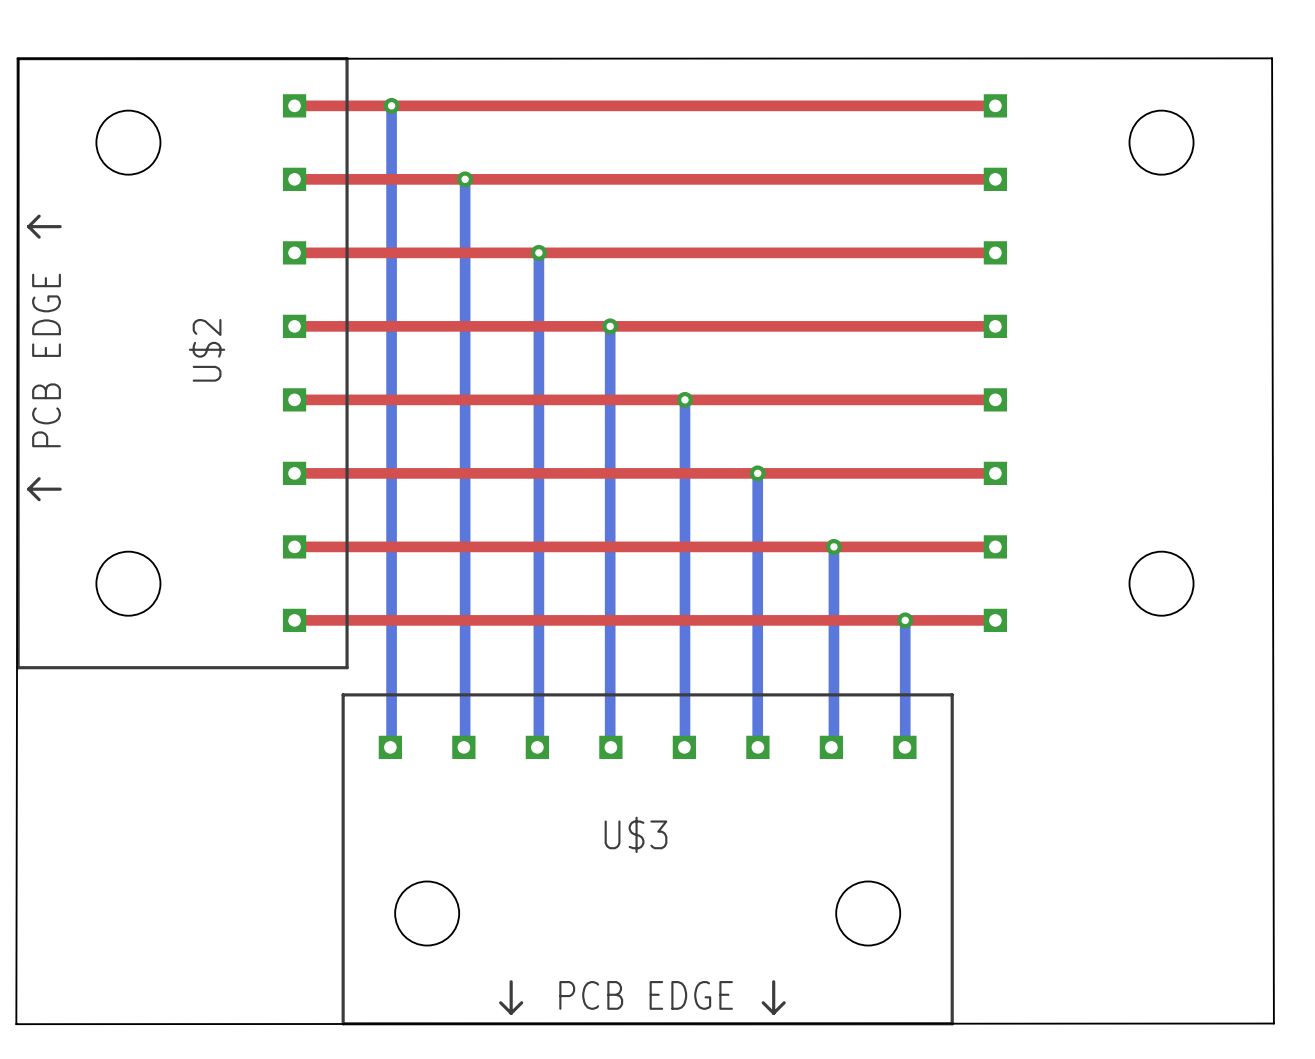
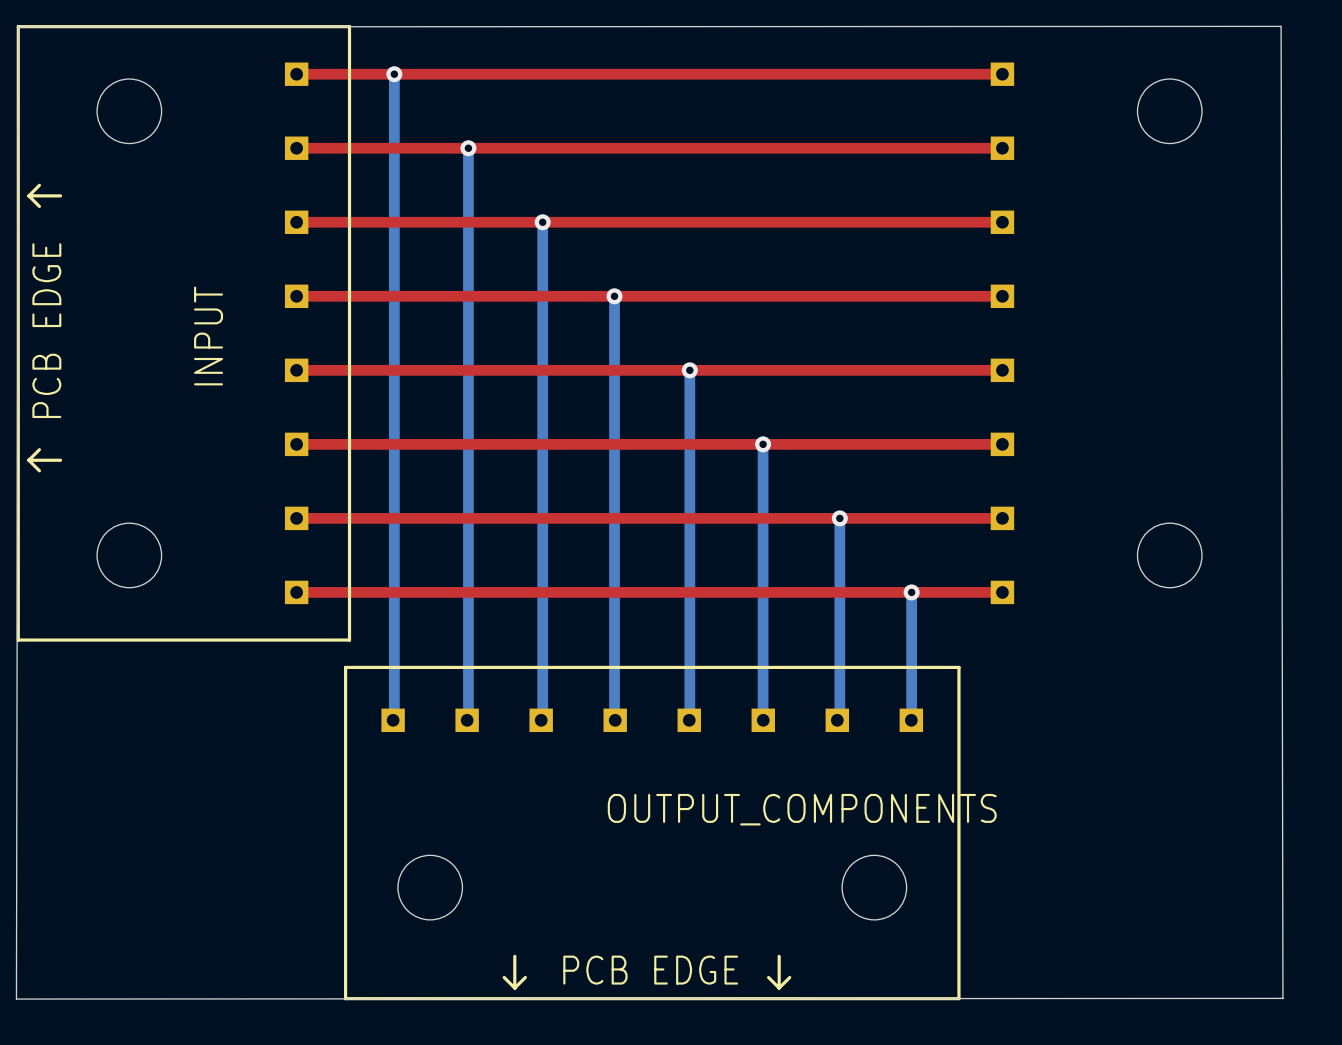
U$2 name: U$2 (207, 350) -> INPUT (208, 335)
U$3 name: U$3 (635, 834) -> OUTPUT_COMPONENTS (802, 809)

